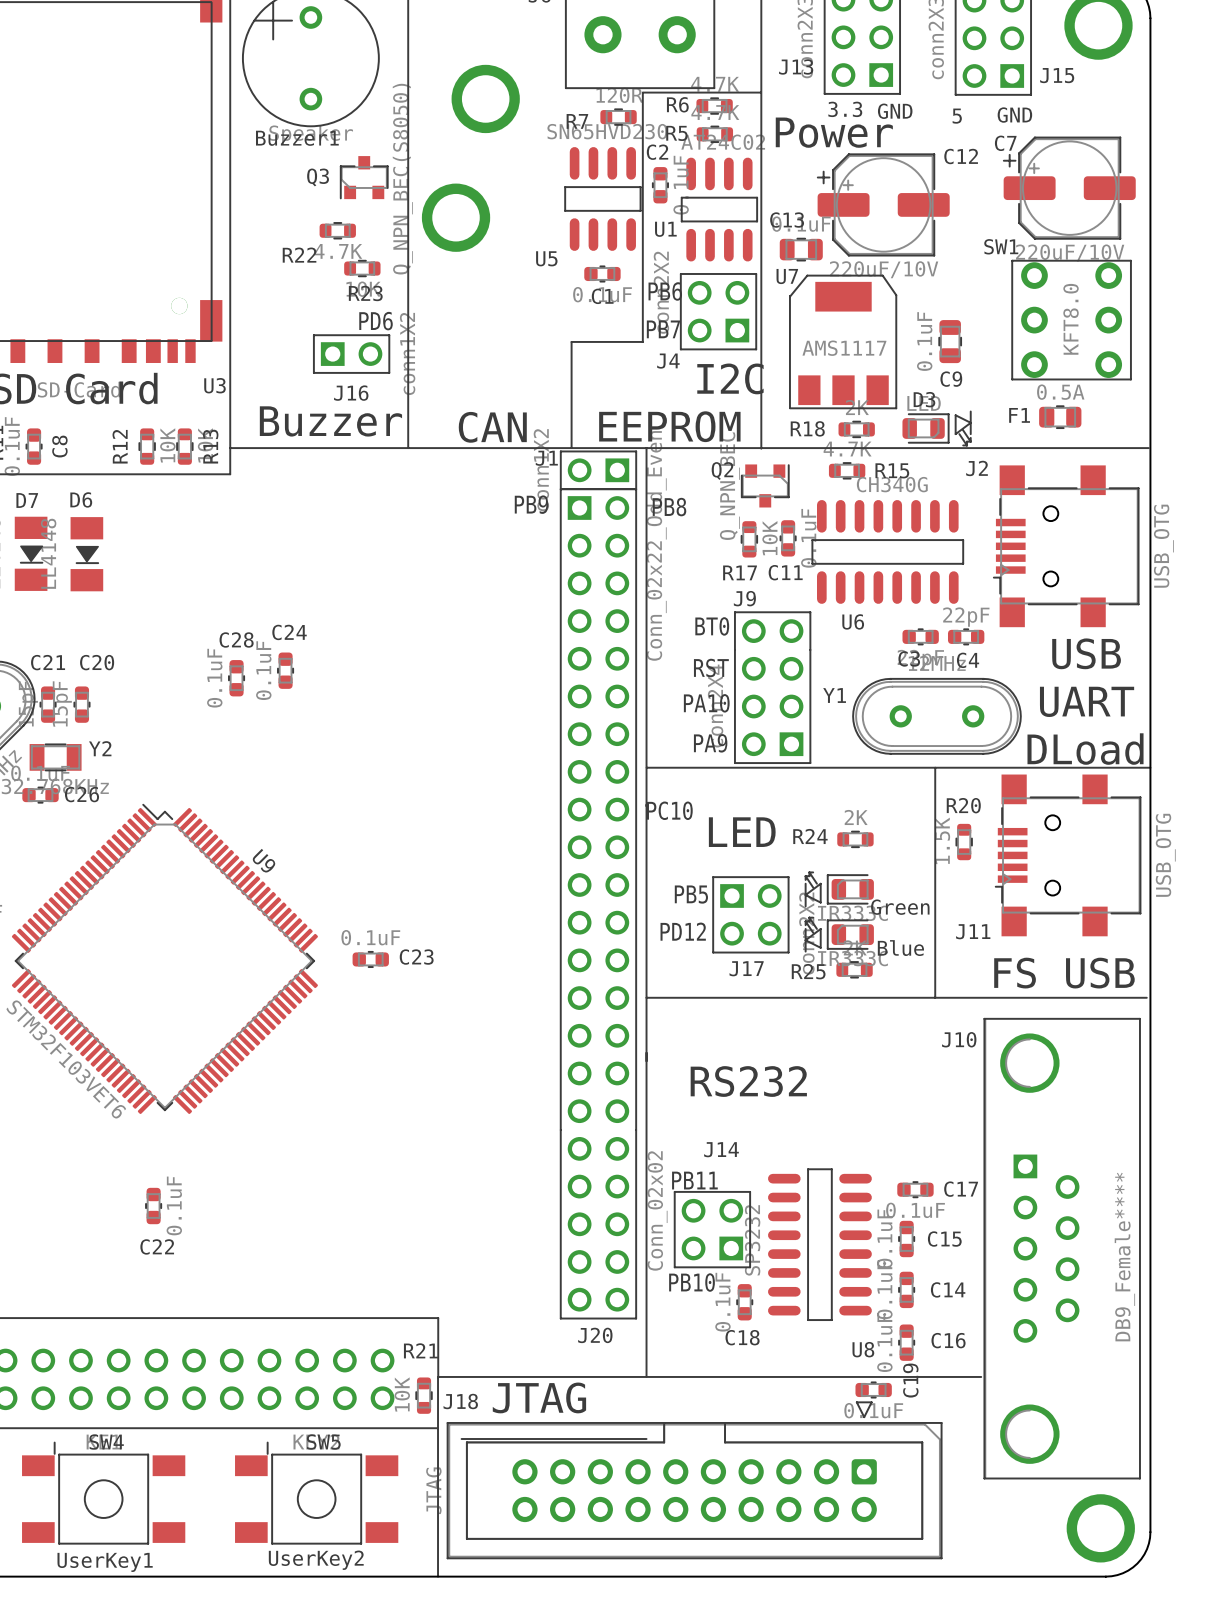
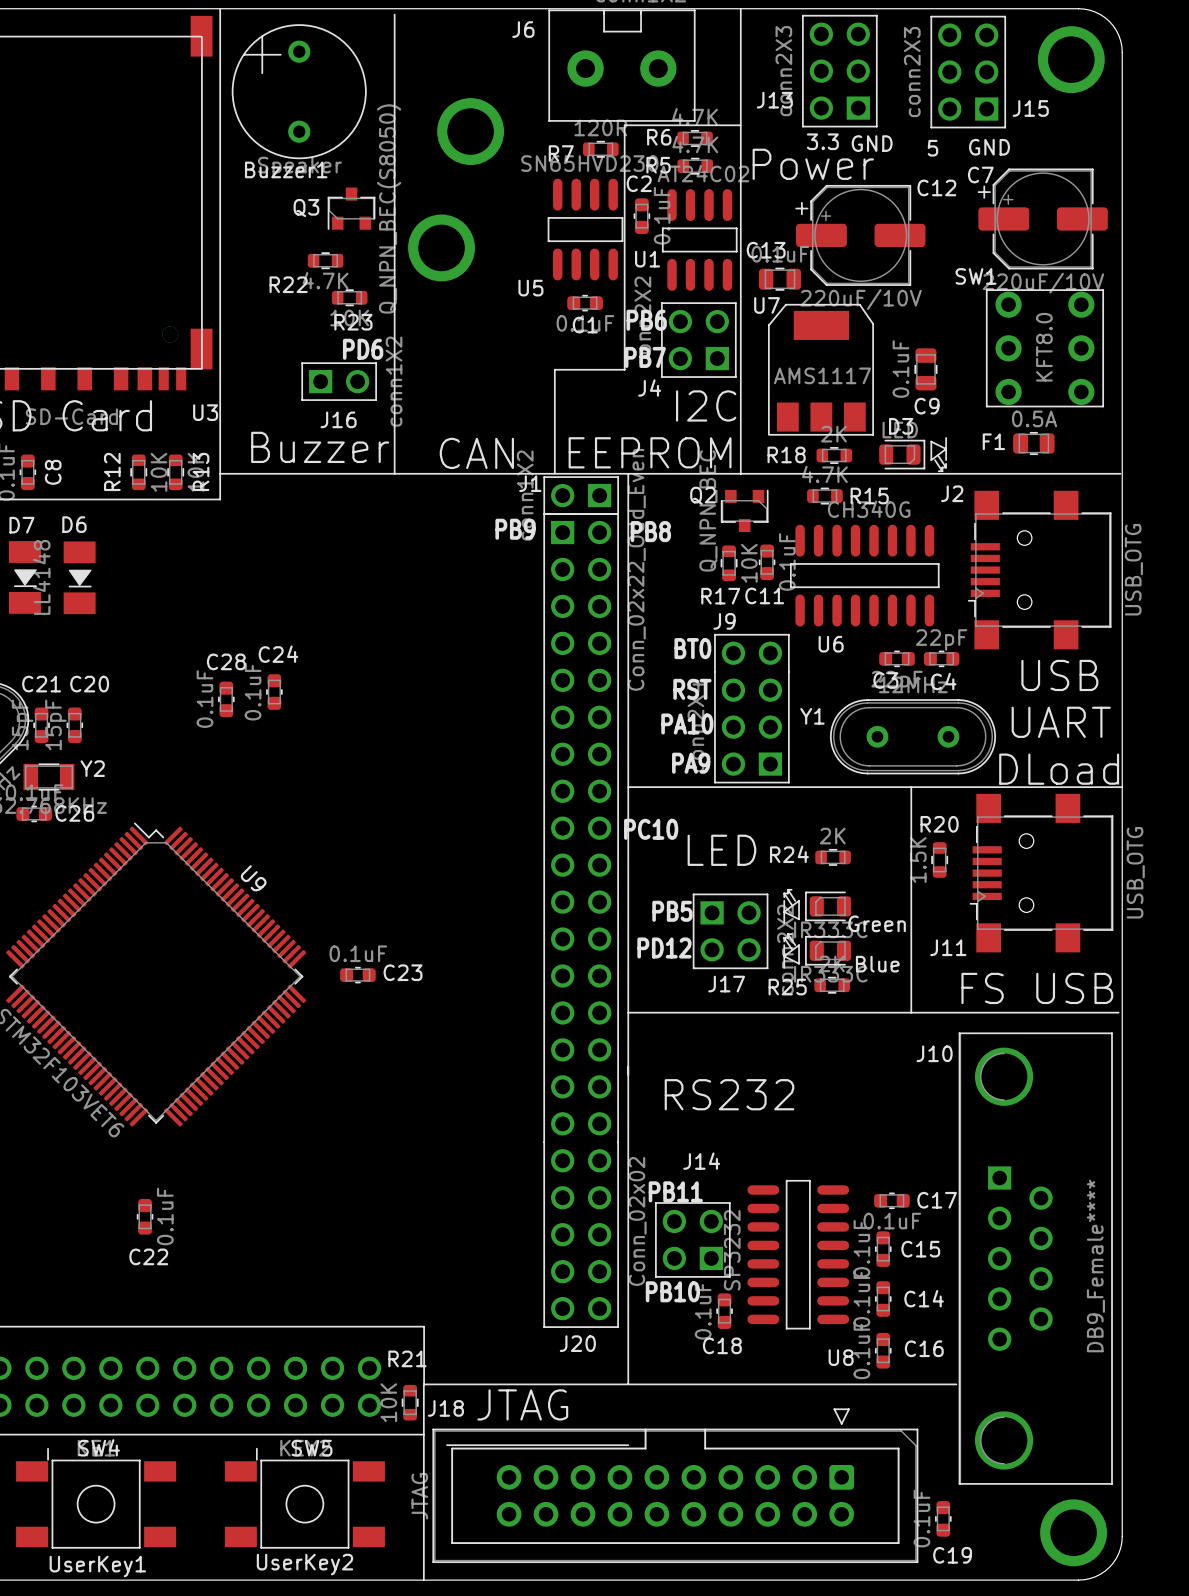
C19 rotation: 0° (873, 1389) -> 90° clockwise (943, 1518)
C19 position: (873, 1389) -> (943, 1518)

